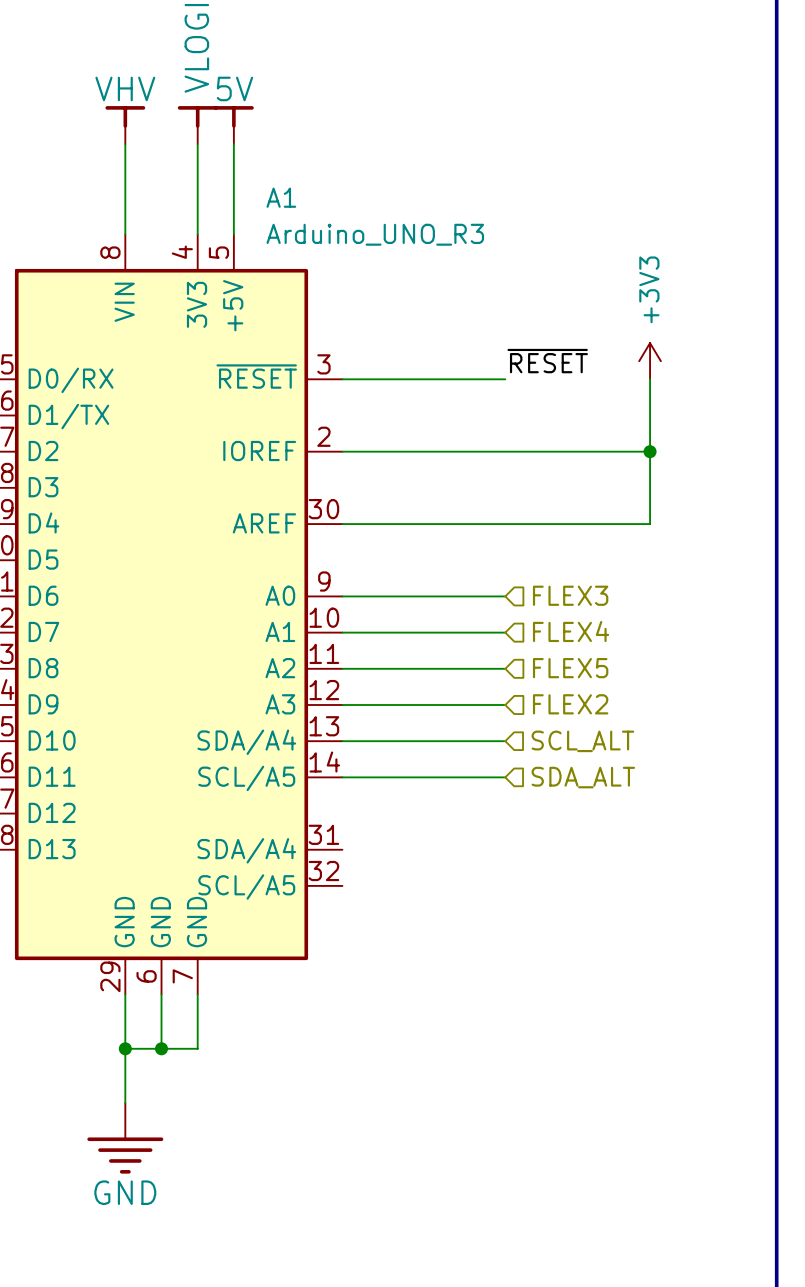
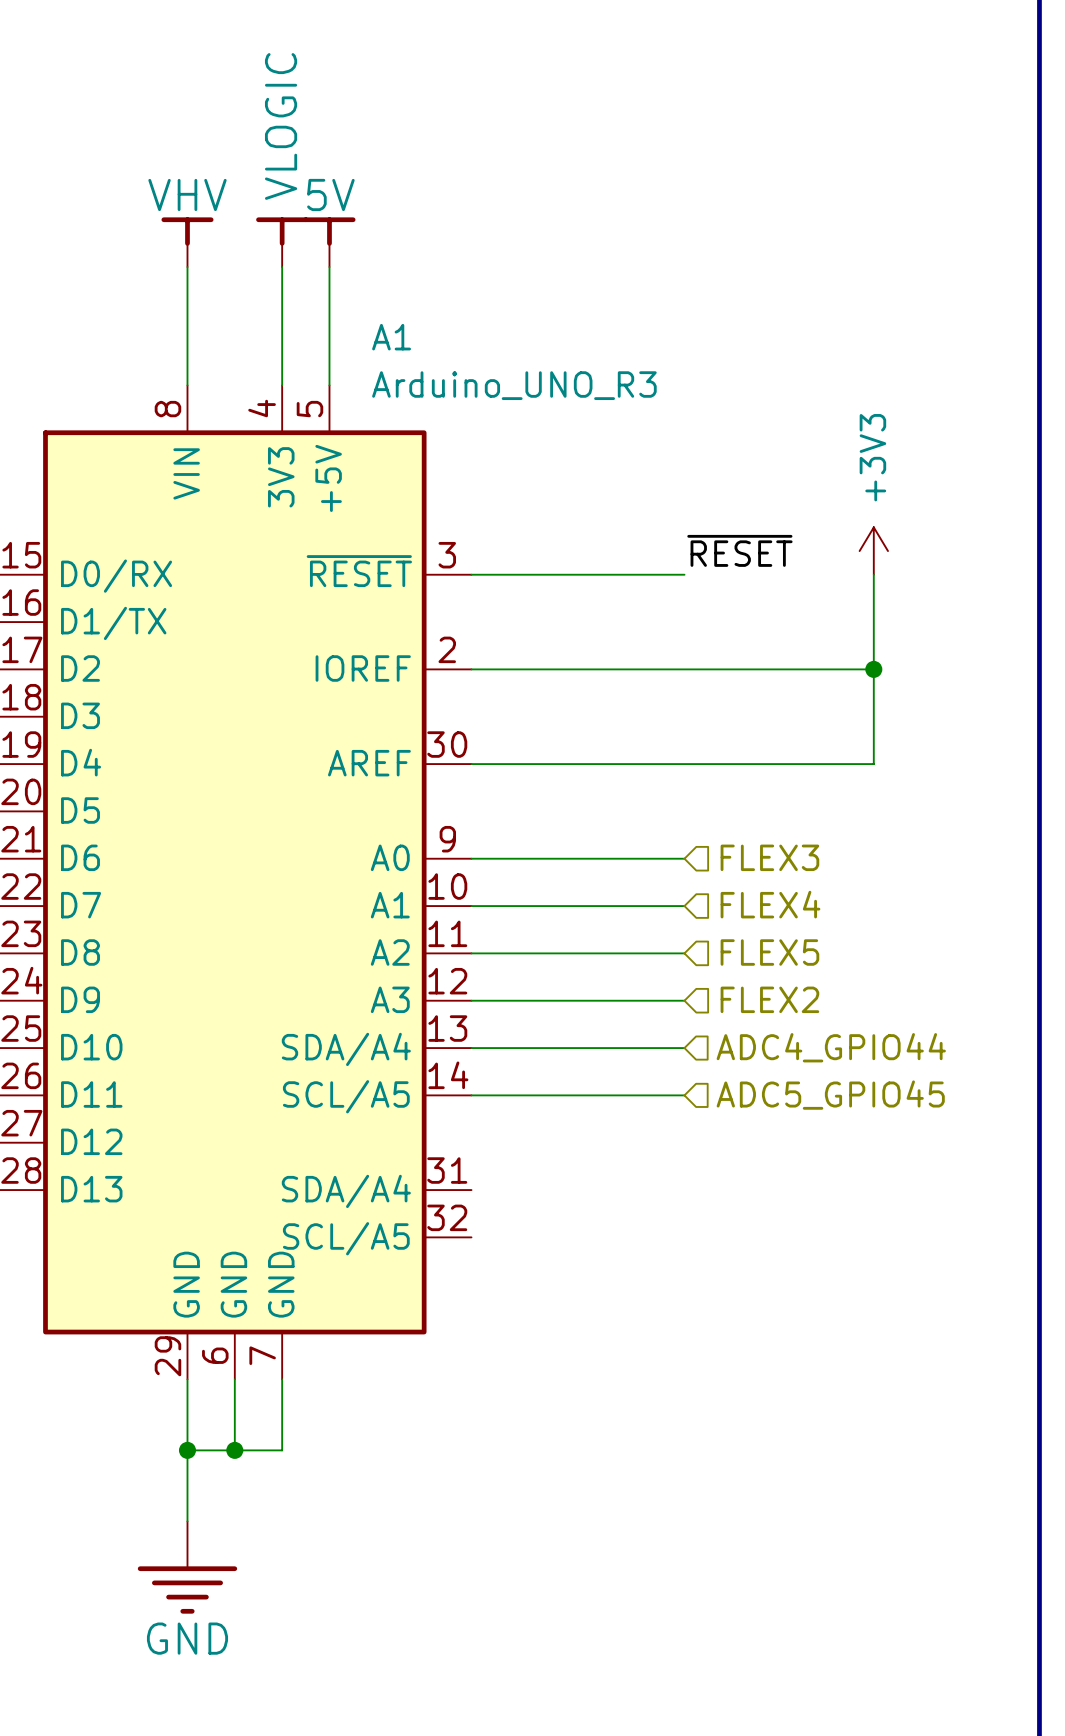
hierarchical label: SCL_ALT (582, 741) -> ADC4_GPIO44 (831, 1047)
hierarchical label: SDA_ALT (583, 777) -> ADC5_GPIO45 (830, 1095)

